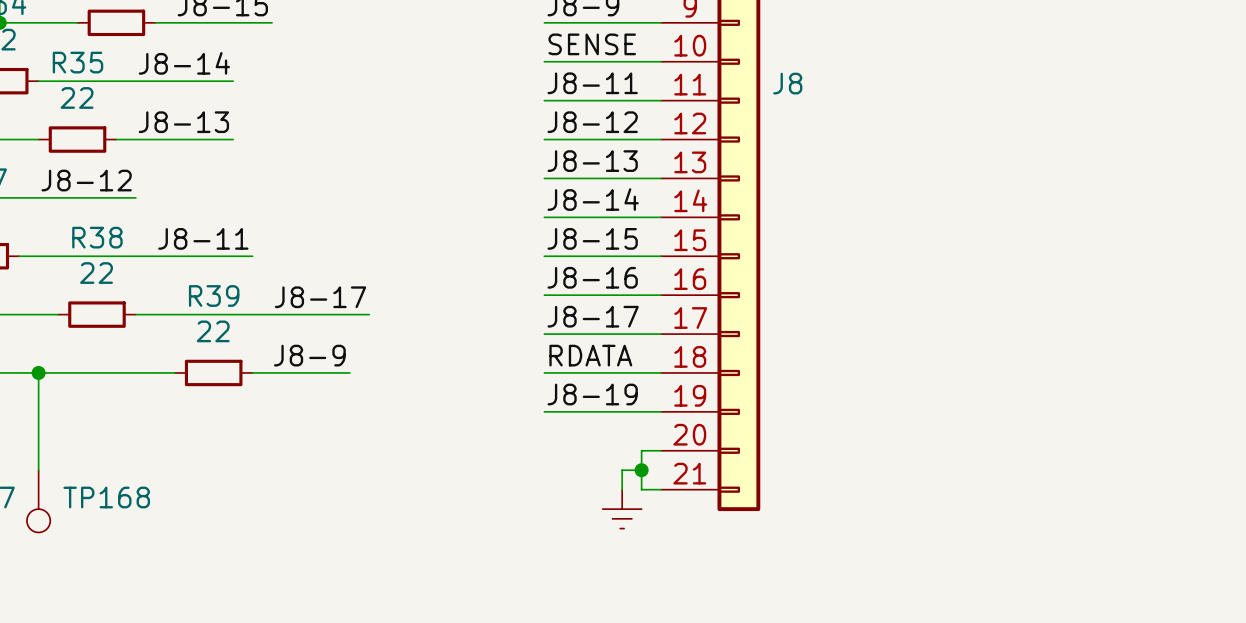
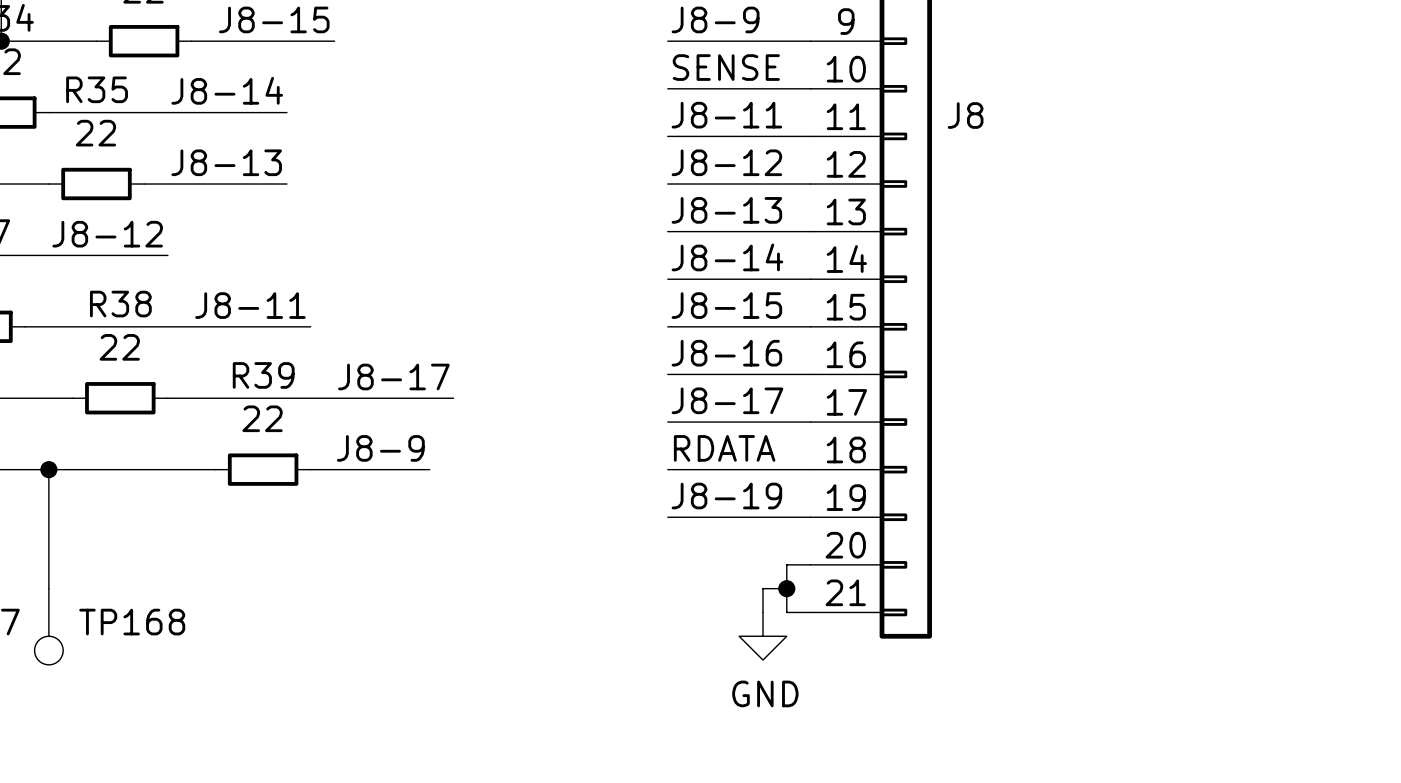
power symbol shape: [602, 489, 642, 529] -> [739, 612, 787, 661]
power symbol text: none -> GND (765, 693)

